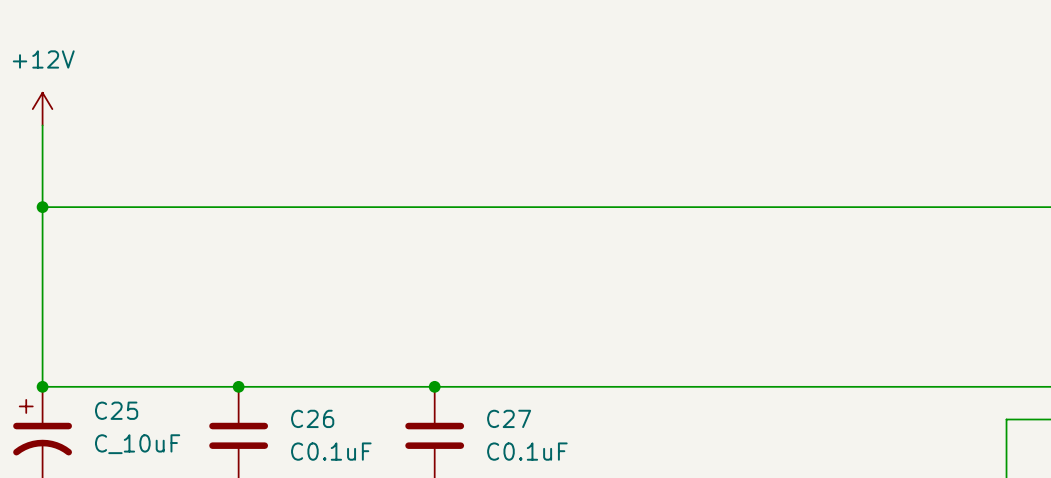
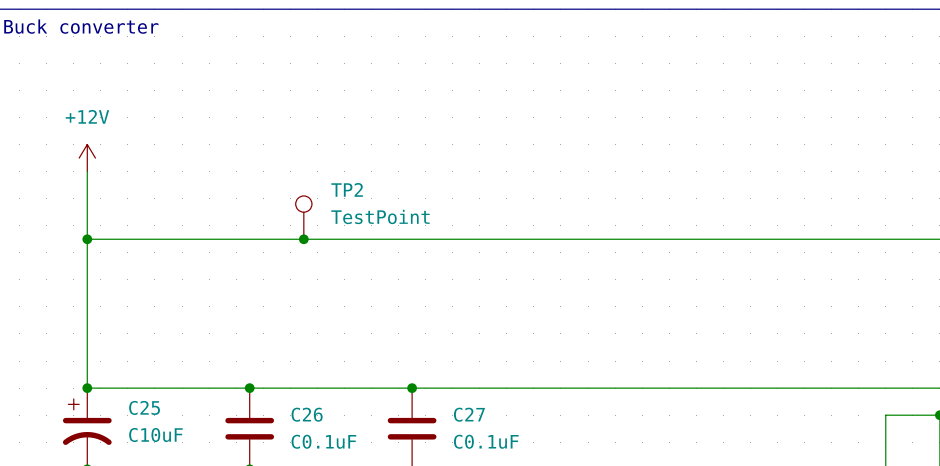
TP2: none -> TestPoint (303, 217)
junction: none -> (303, 239)
C25 value: C_10uF (137, 444) -> C10uF (155, 434)

